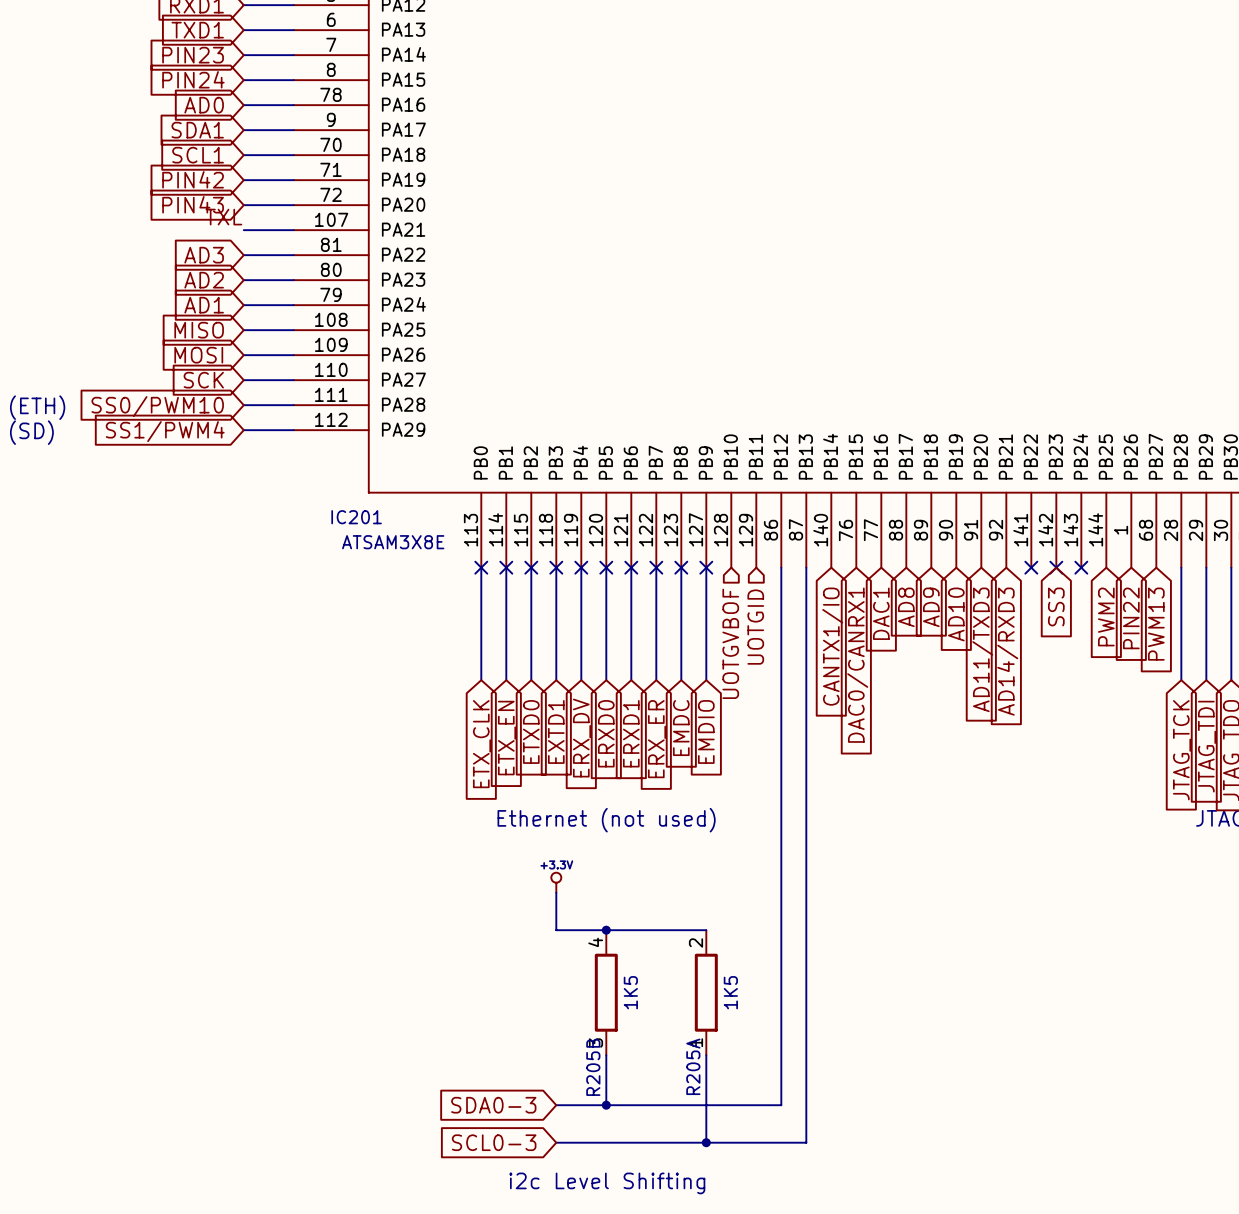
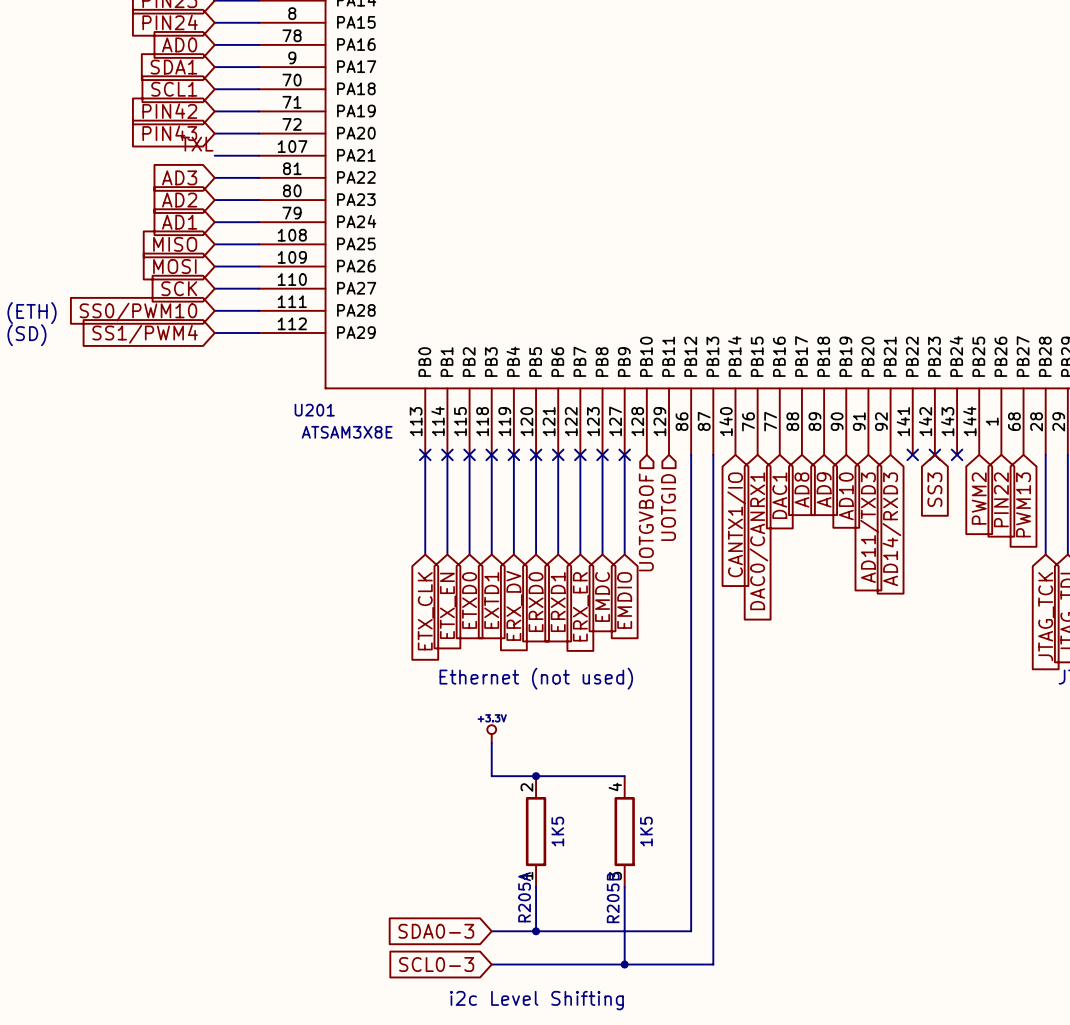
IC201 name: IC201 (356, 517) -> U201 (314, 410)
R205B position: (606, 992) -> (624, 831)
R205A position: (706, 992) -> (536, 831)

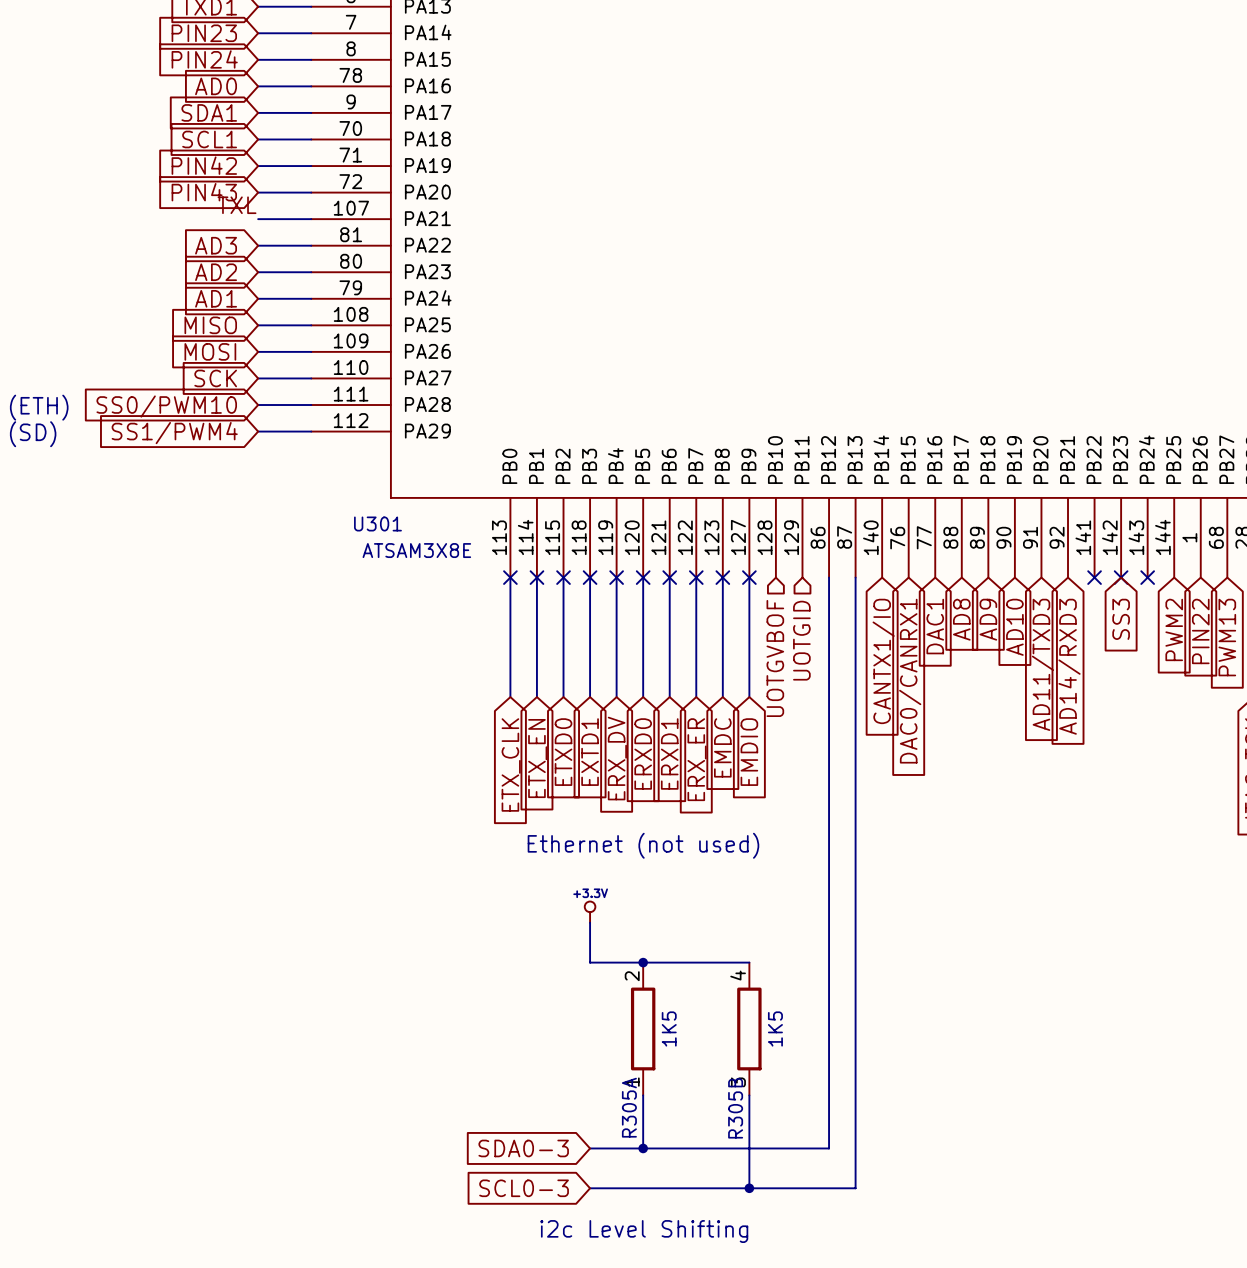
U201 name: U201 (314, 410) -> U301 (377, 523)
R205A name: R205A (524, 897) -> R305A (629, 1107)
R205B name: R205B (613, 897) -> R305B (735, 1108)

